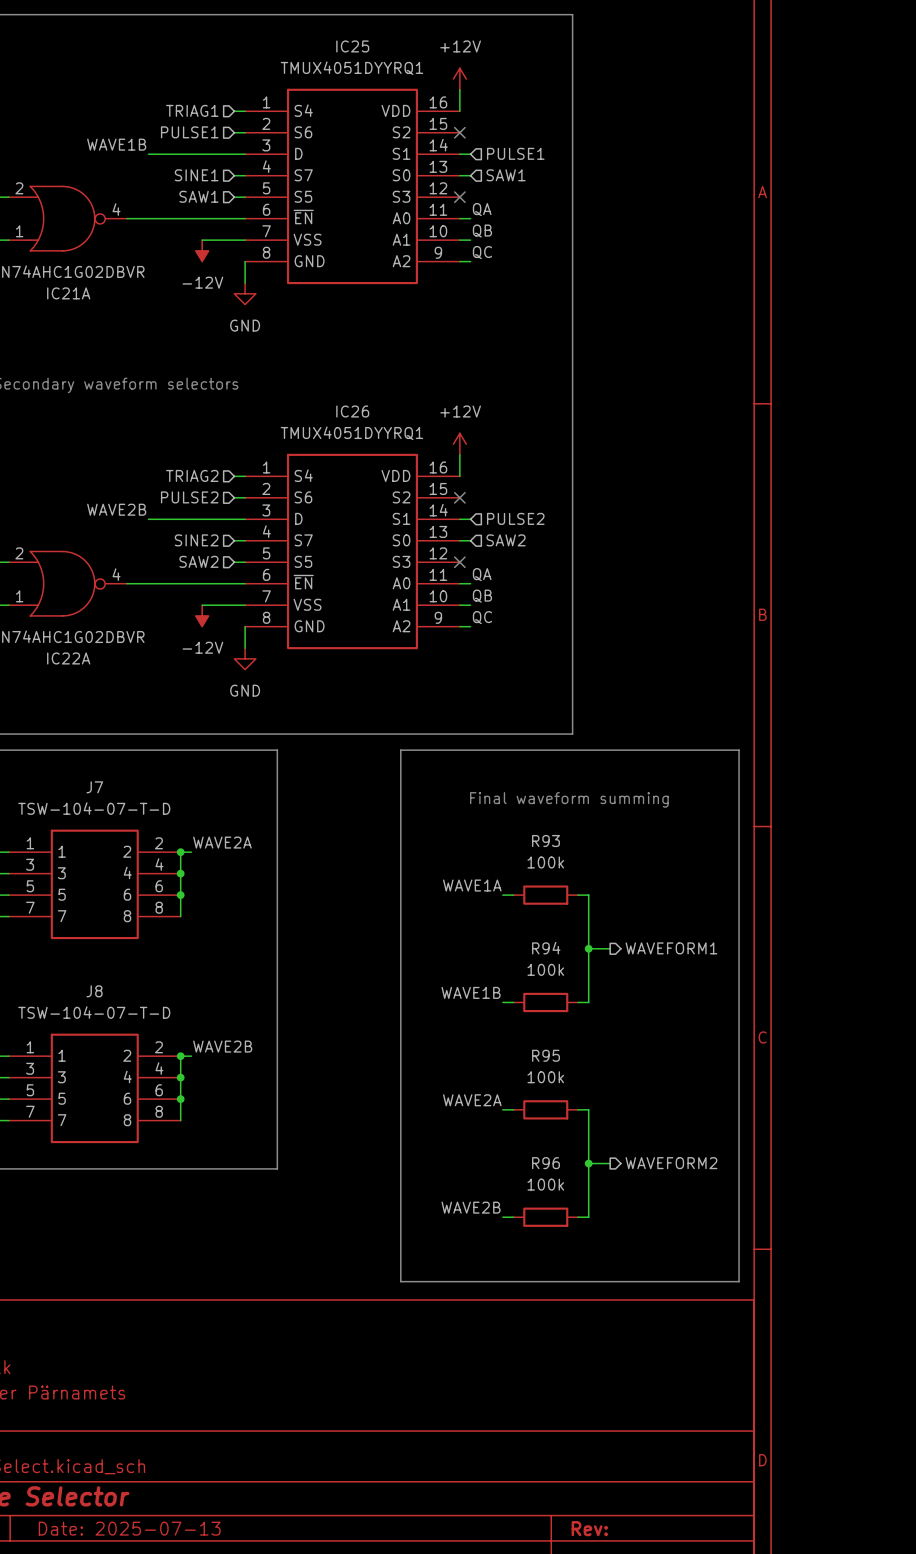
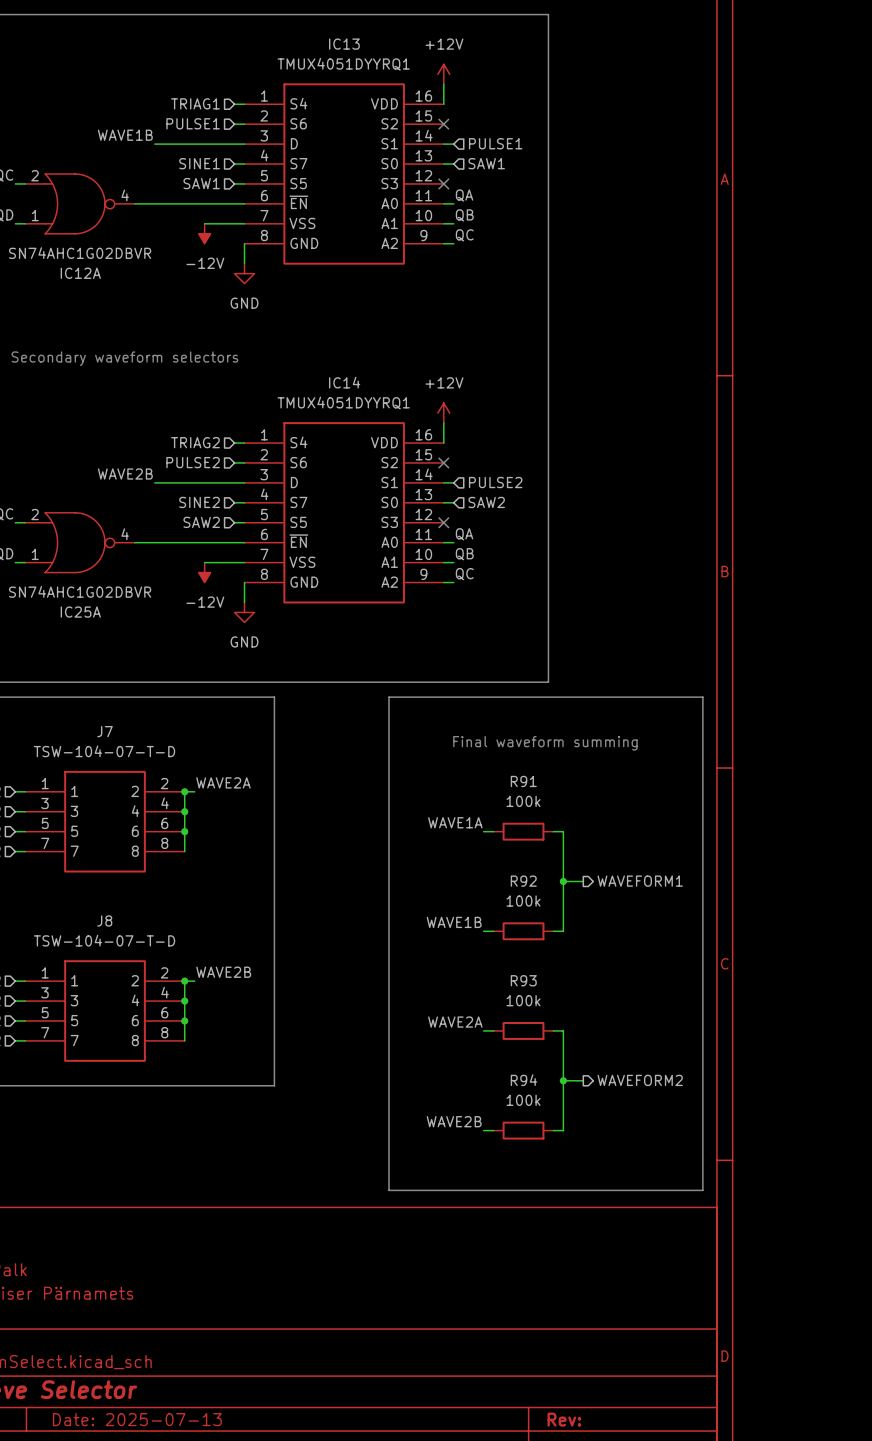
IC25 name: IC25 (352, 46) -> IC13 (344, 44)
IC21A name: IC21A (68, 293) -> IC12A (80, 273)
IC26 name: IC26 (352, 411) -> IC14 (344, 382)
IC22A name: IC22A (68, 658) -> IC25A (80, 612)
R93 name: R93 (546, 841) -> R91 (523, 781)
R94 name: R94 (546, 948) -> R92 (523, 881)
R95 name: R95 (546, 1055) -> R93 (523, 980)
R96 name: R96 (546, 1163) -> R94 (523, 1080)

